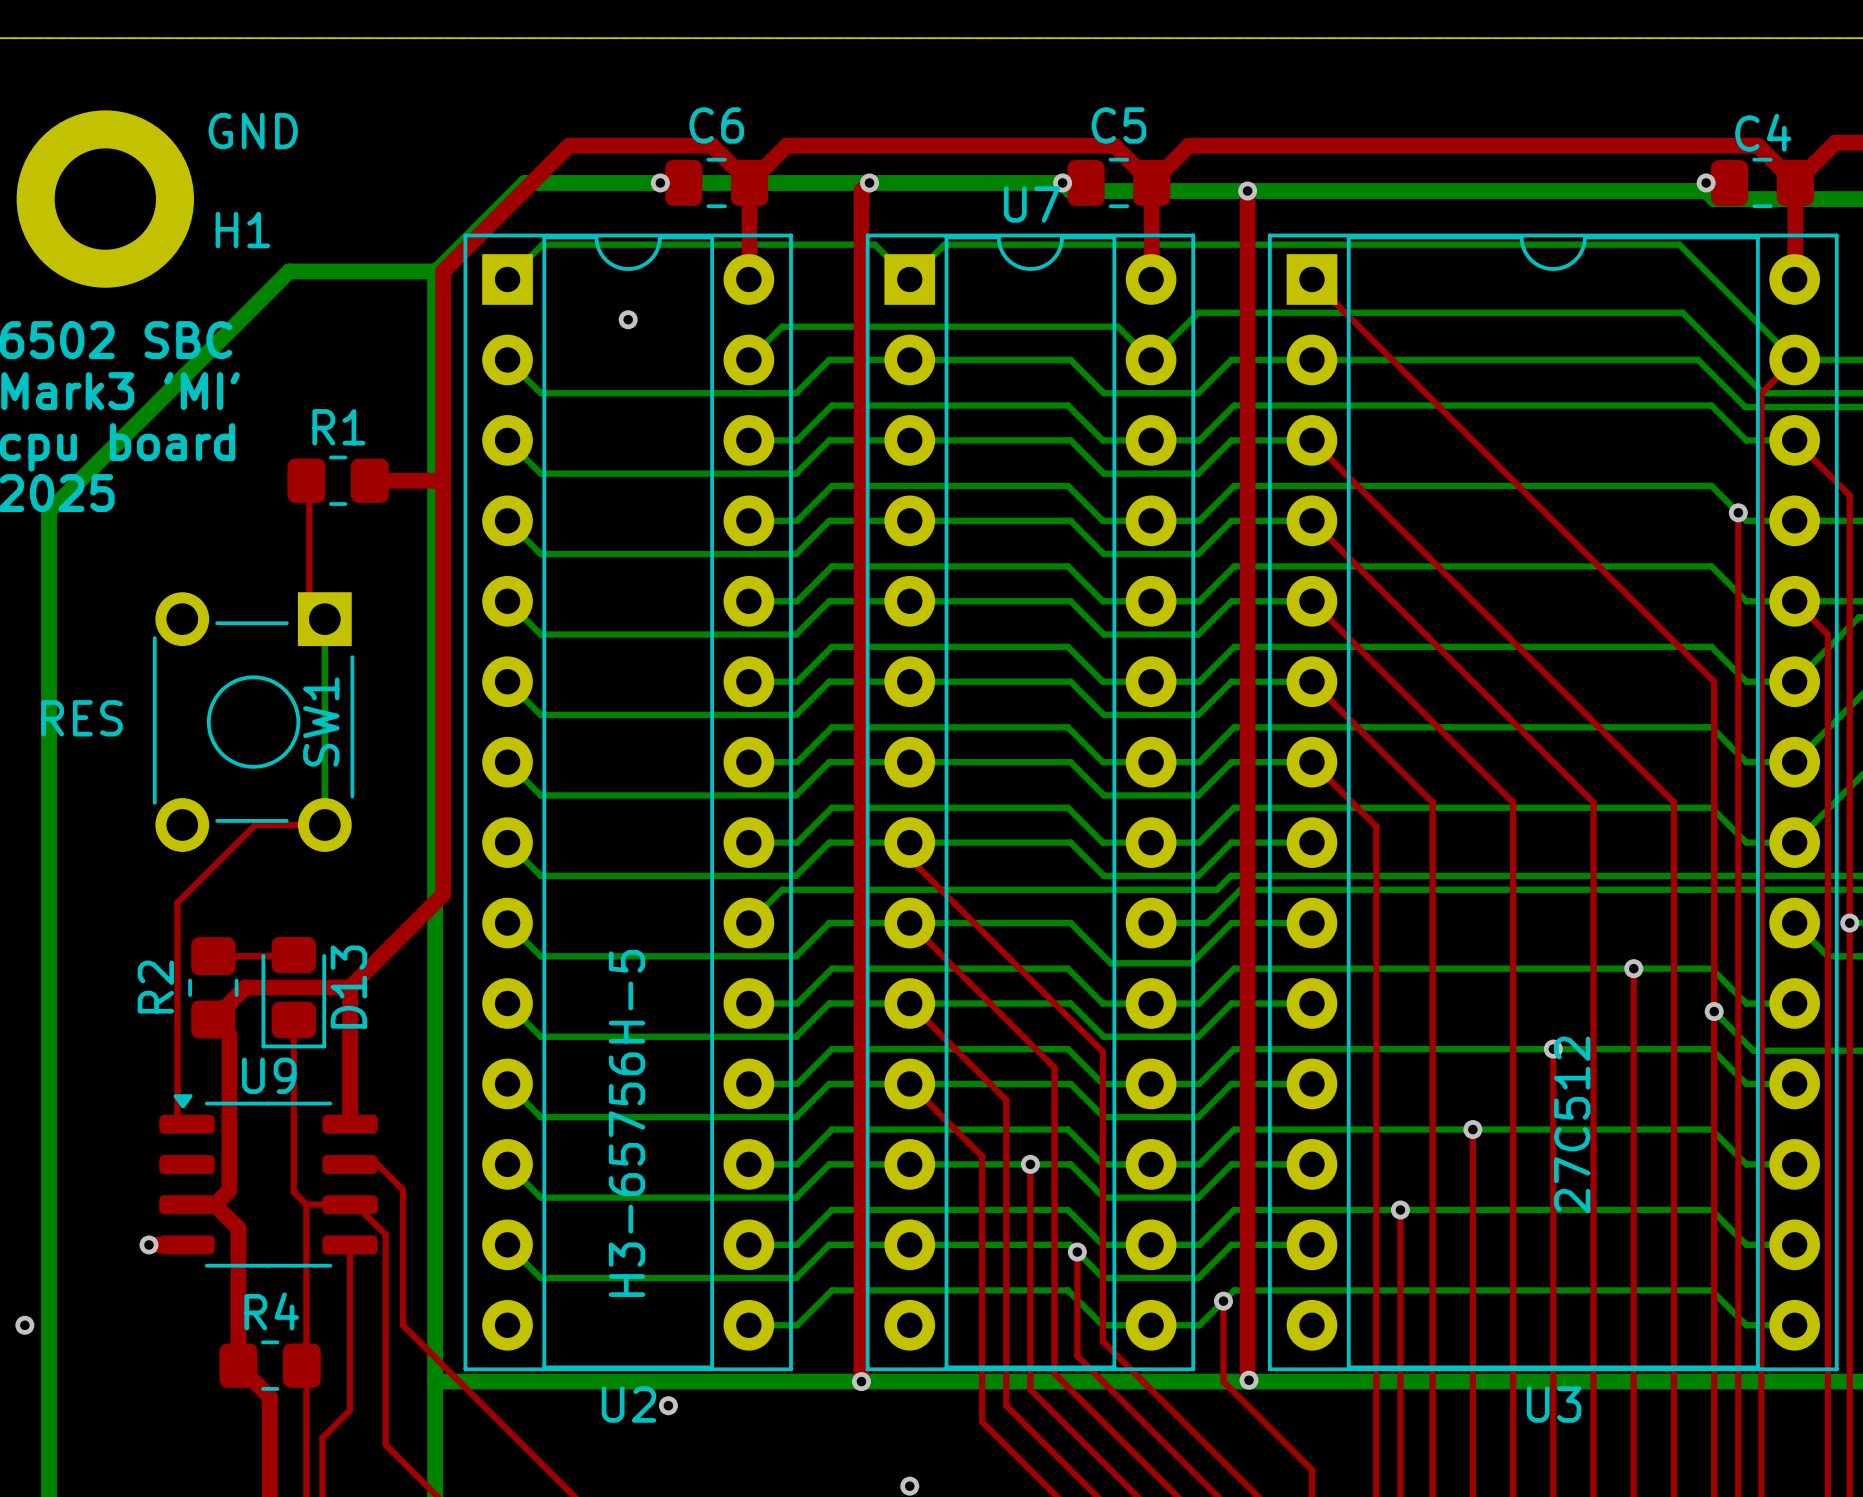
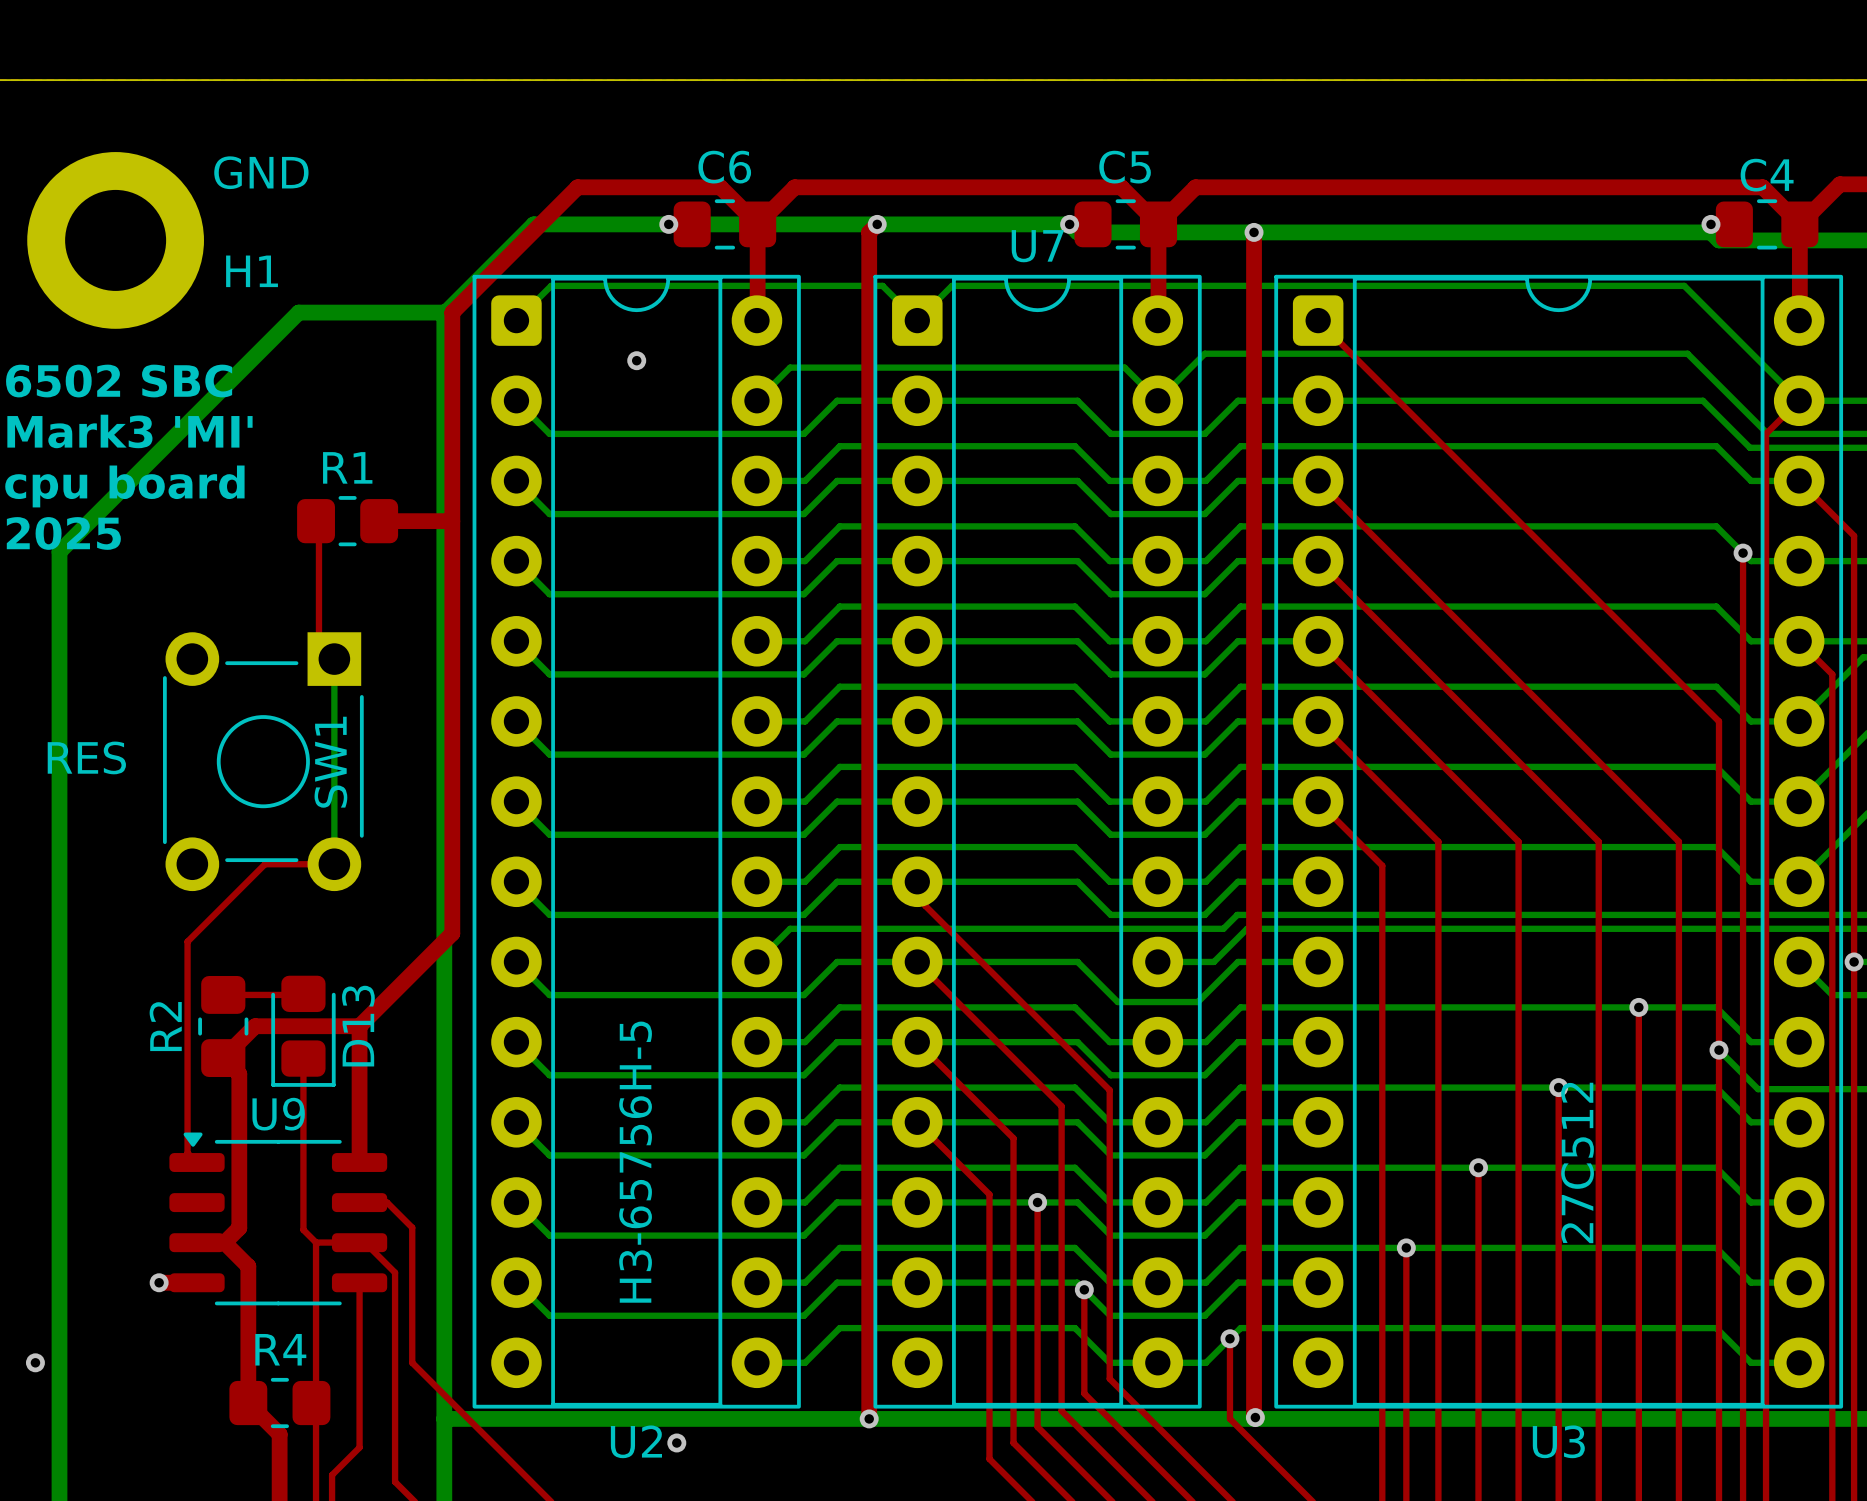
U2 footprint: [463, 233, 793, 1372] -> [472, 274, 801, 1409]
U7 footprint: [865, 233, 1196, 1372] -> [873, 274, 1202, 1409]
U3 footprint: [1267, 233, 1839, 1372] -> [1274, 274, 1844, 1409]

